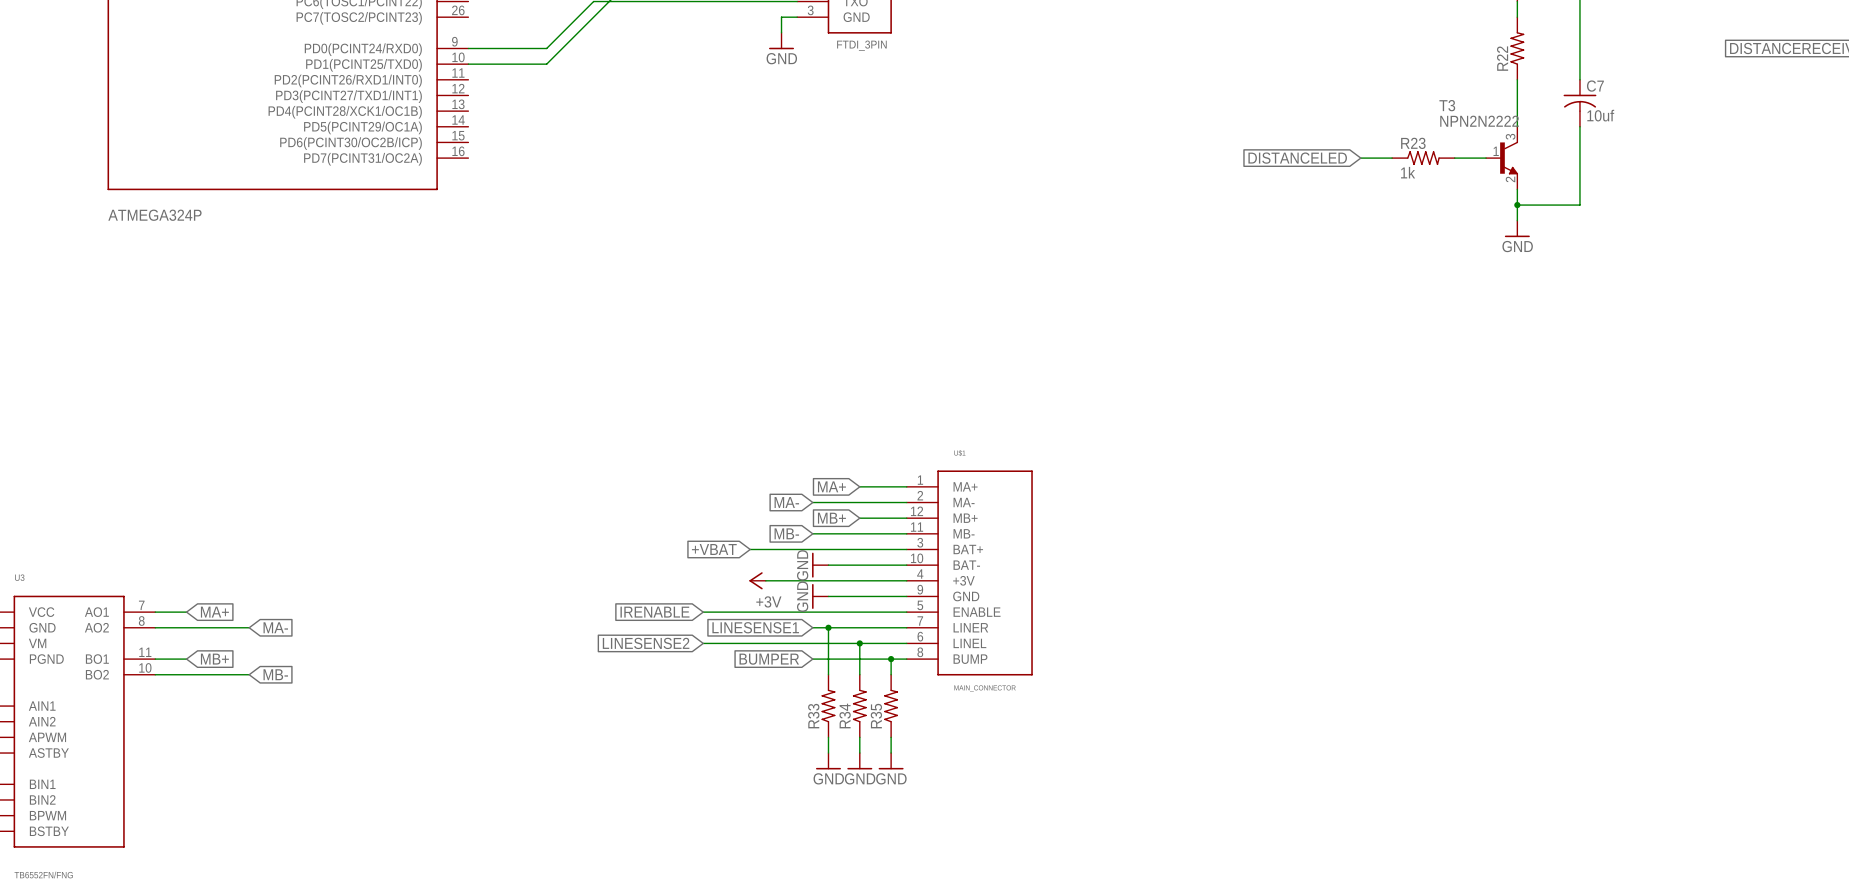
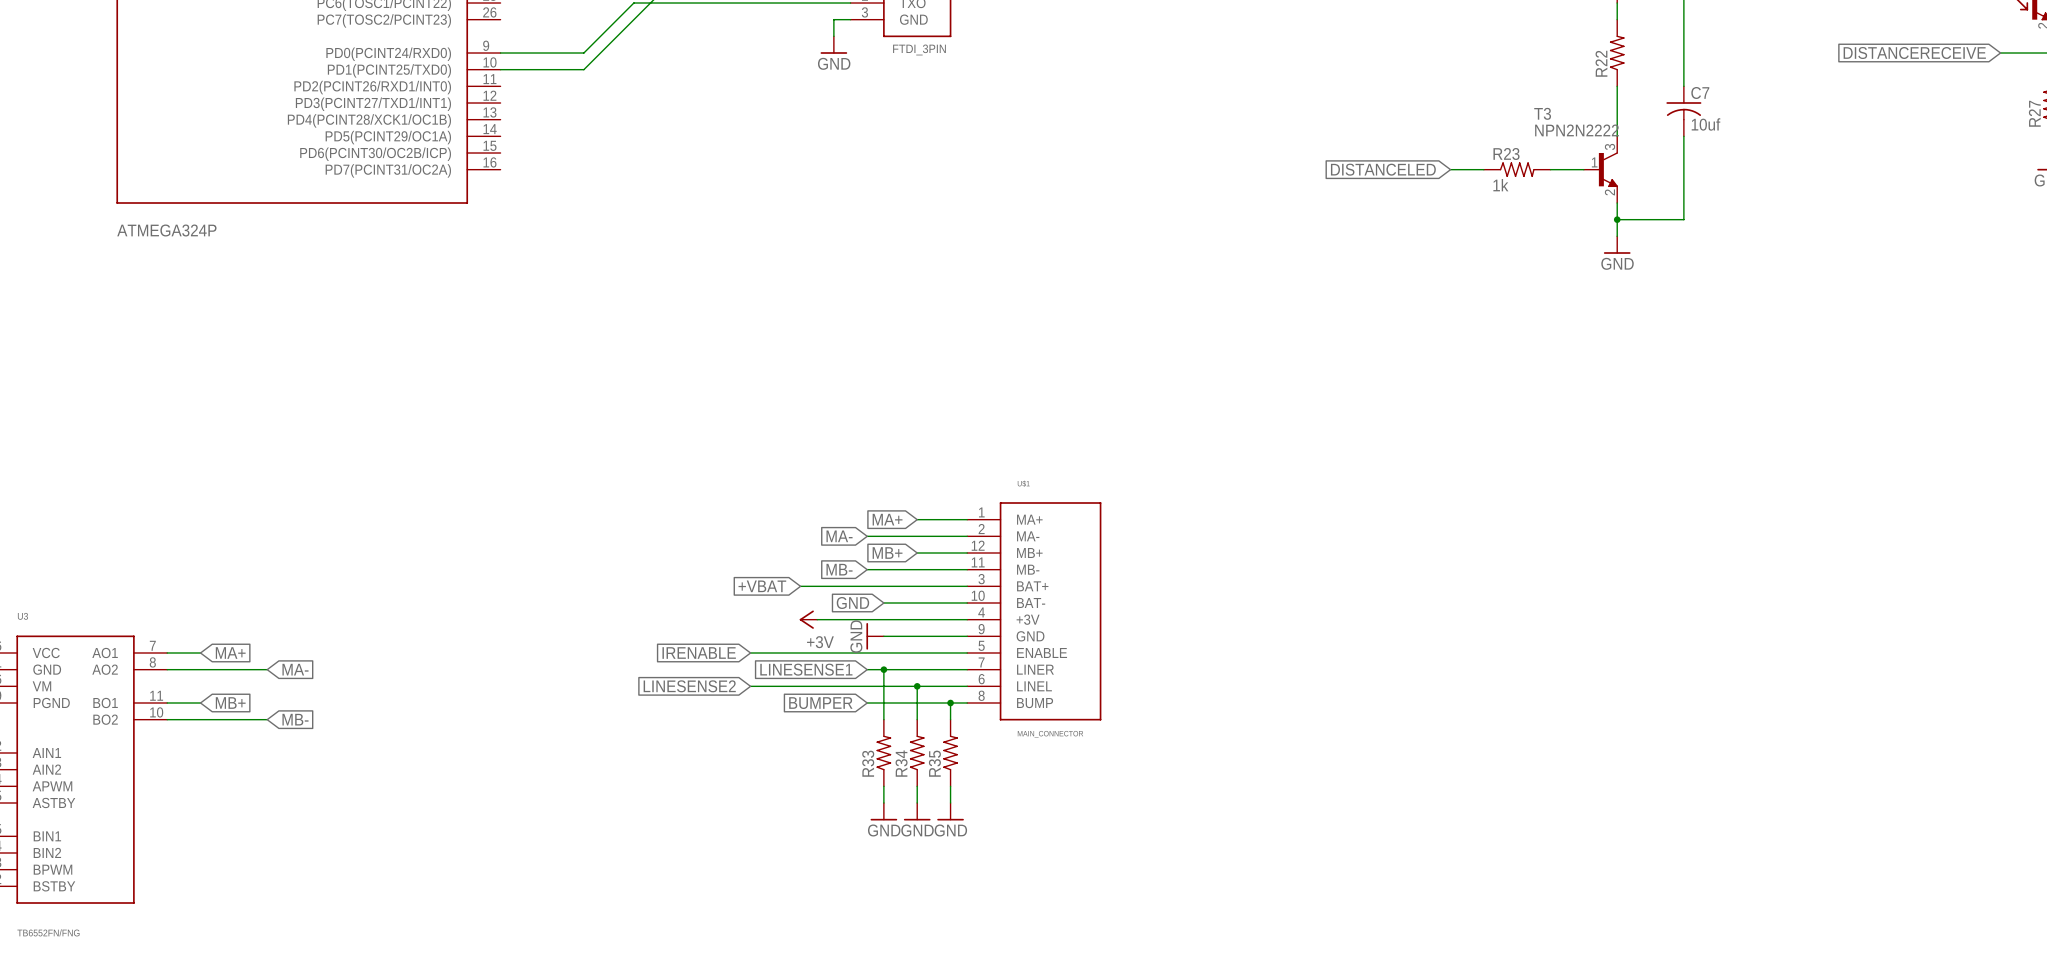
global label: none -> GND (852, 602)
power symbol: GND (820, 565) -> none

